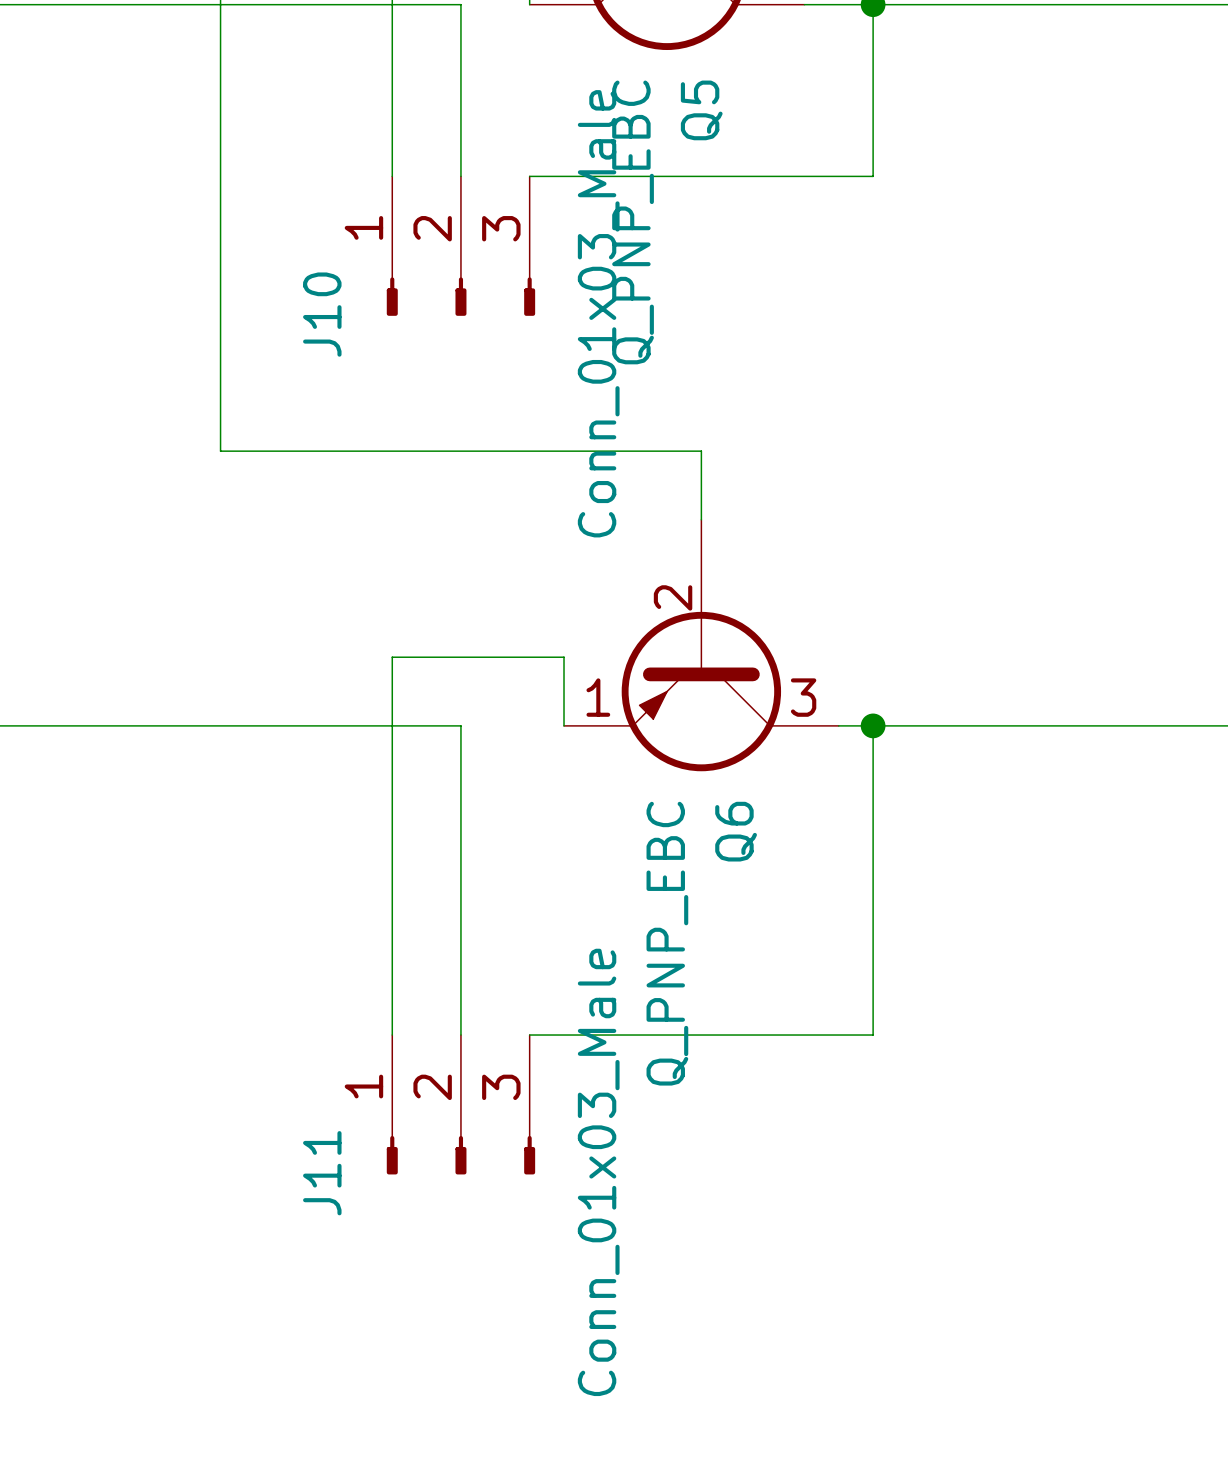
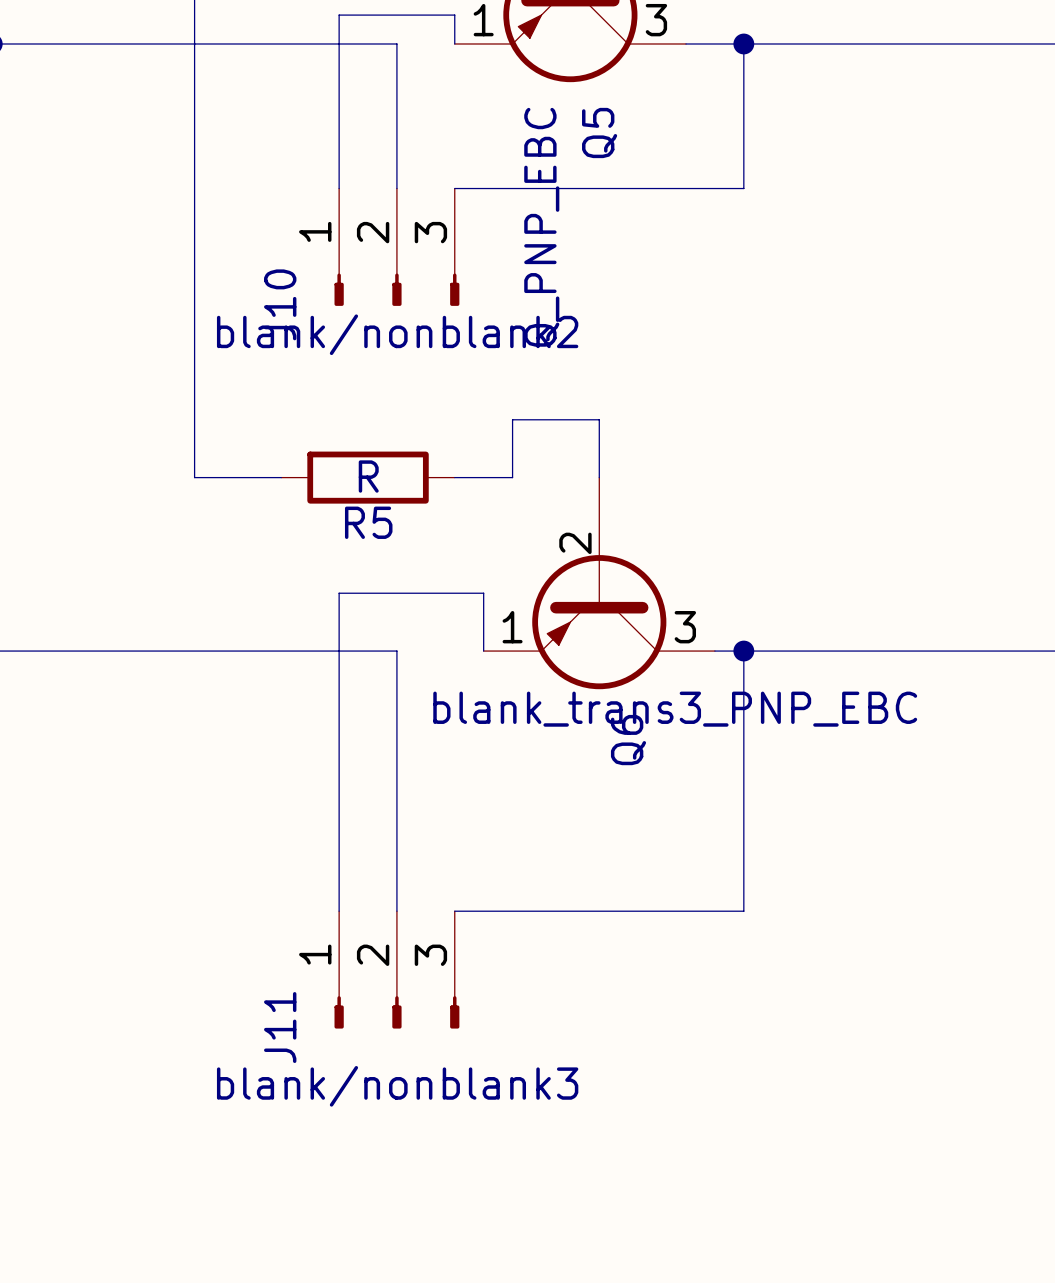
J10 value: Conn_01x03_Male (598, 313) -> blank/nonblank2 (397, 334)
wire: (220, 451) (598, 451) -> (194, 419) (194, 477) (281, 477)
wire: none -> (512, 419) (512, 477) (454, 477)
R5: none -> R (368, 477)
Q6 value: Q_PNP_EBC (667, 943) -> blank_trans3_PNP_EBC (675, 709)
J11 value: Conn_01x03_Male (598, 1172) -> blank/nonblank3 (397, 1086)

